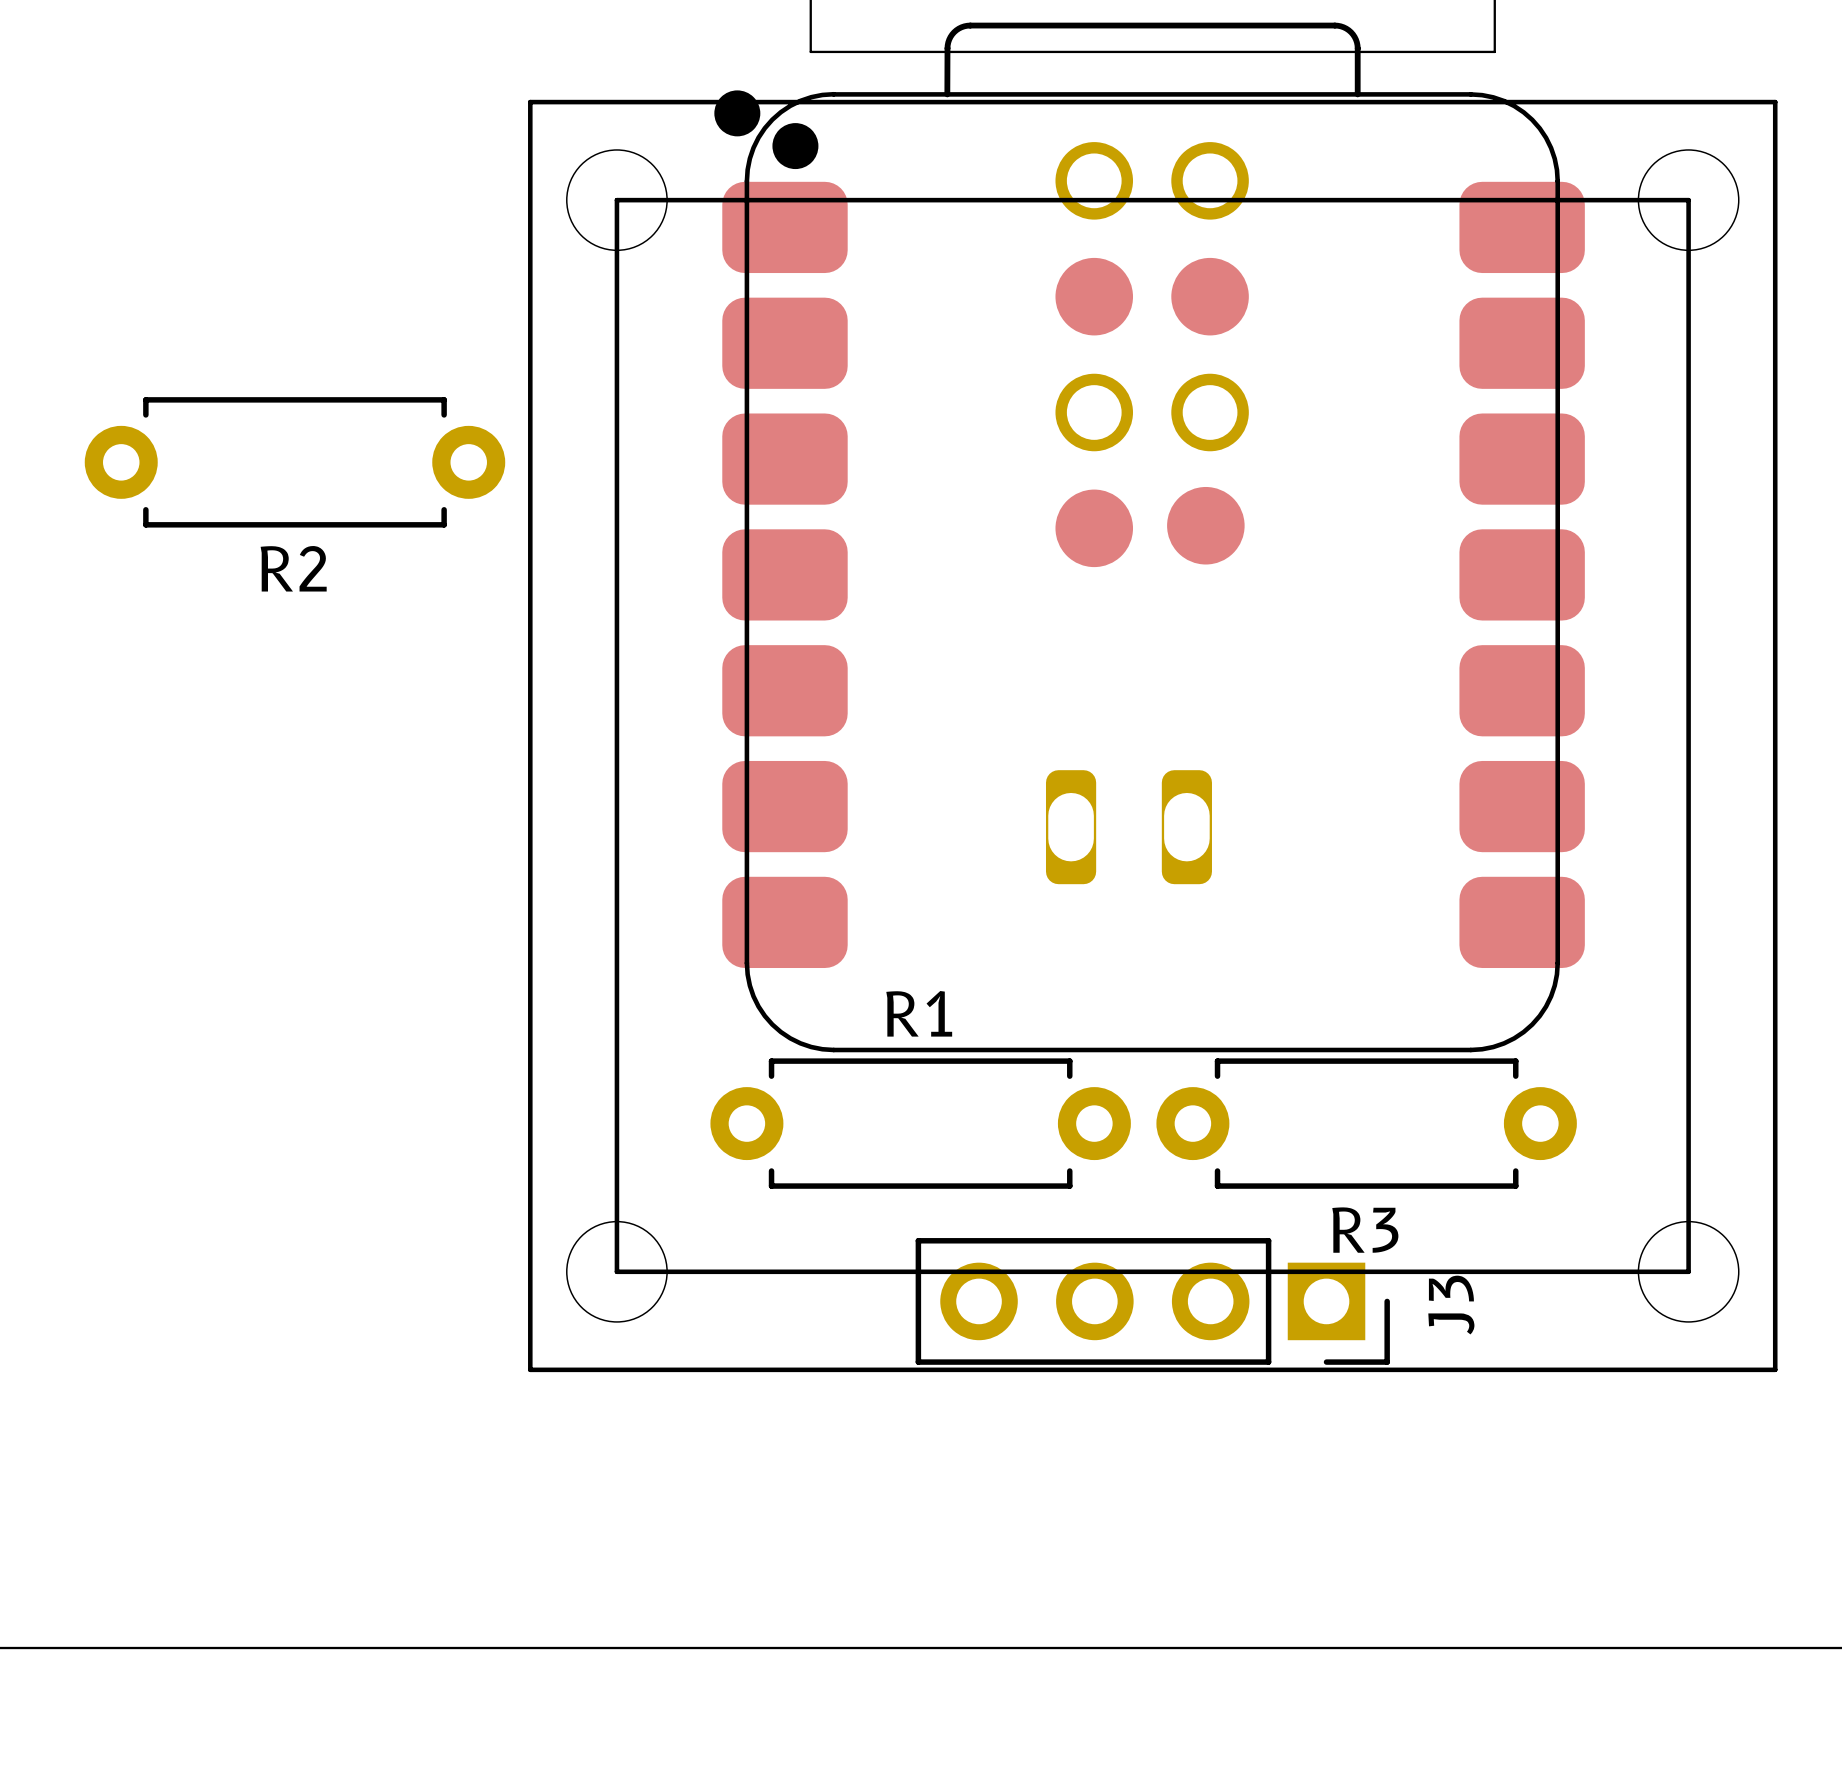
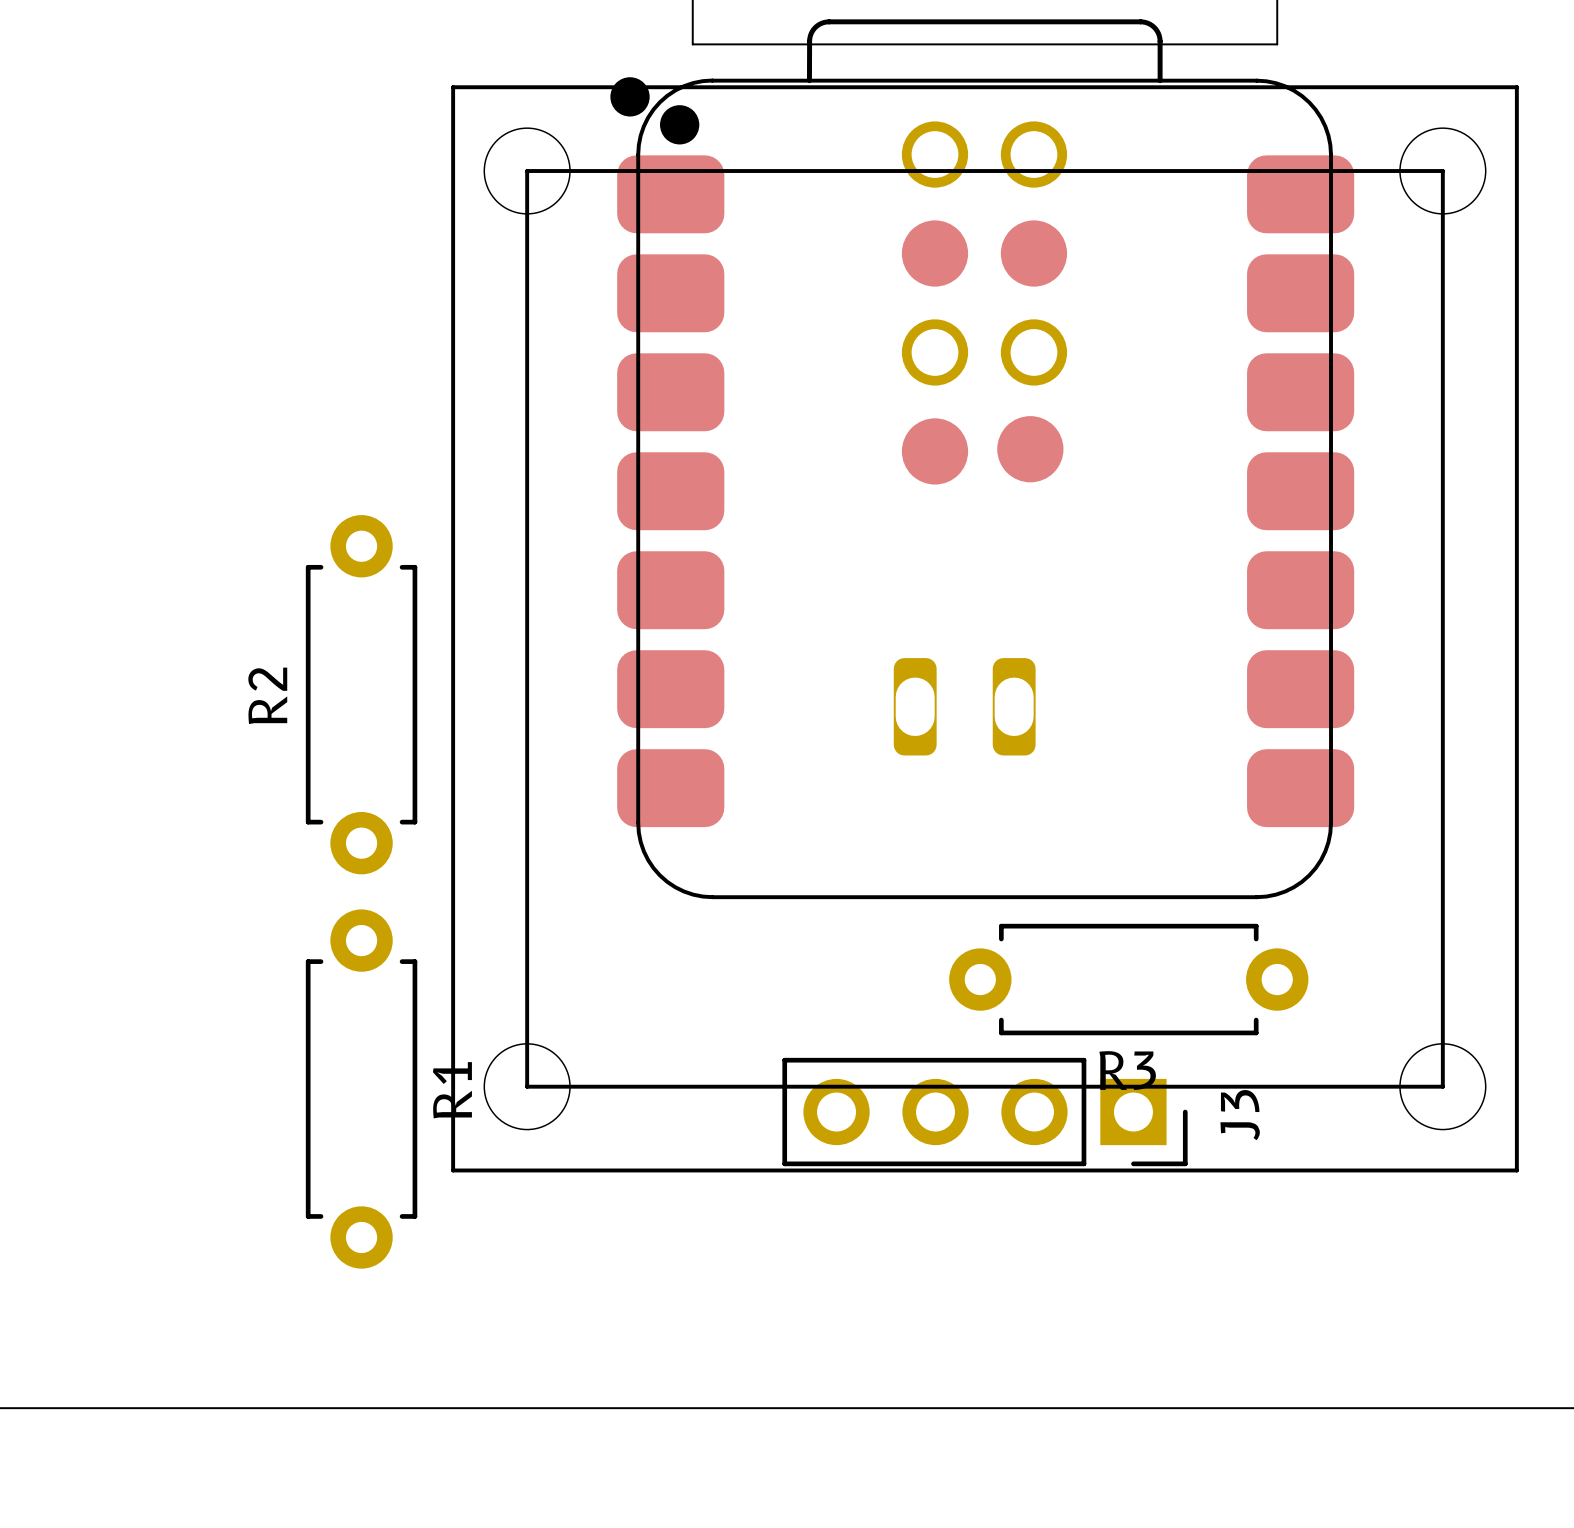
R2 rotation: 0° (294, 462) -> 90° clockwise (361, 694)
R2 position: (294, 462) -> (361, 694)
R1 rotation: 0° (920, 1123) -> 90° clockwise (361, 1089)
R1 position: (920, 1123) -> (361, 1089)
R3 position: (1366, 1123) -> (1128, 979)

